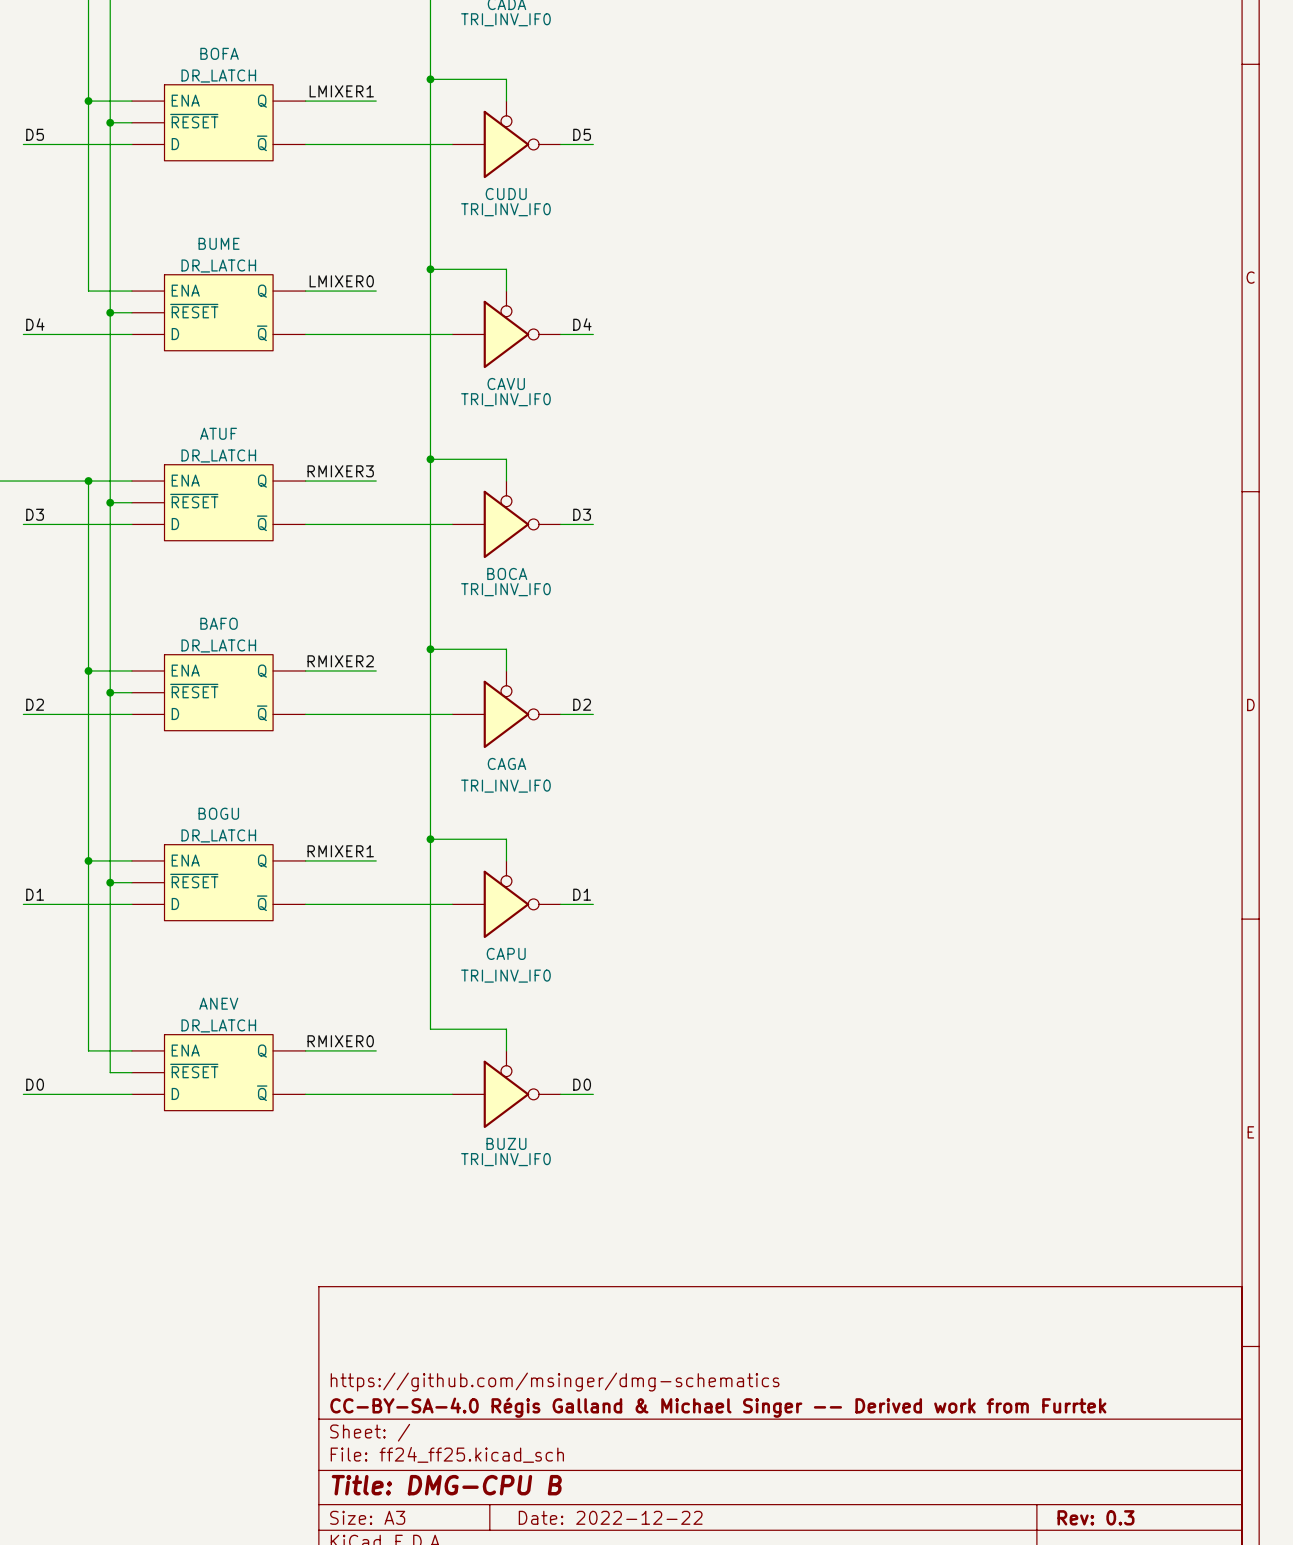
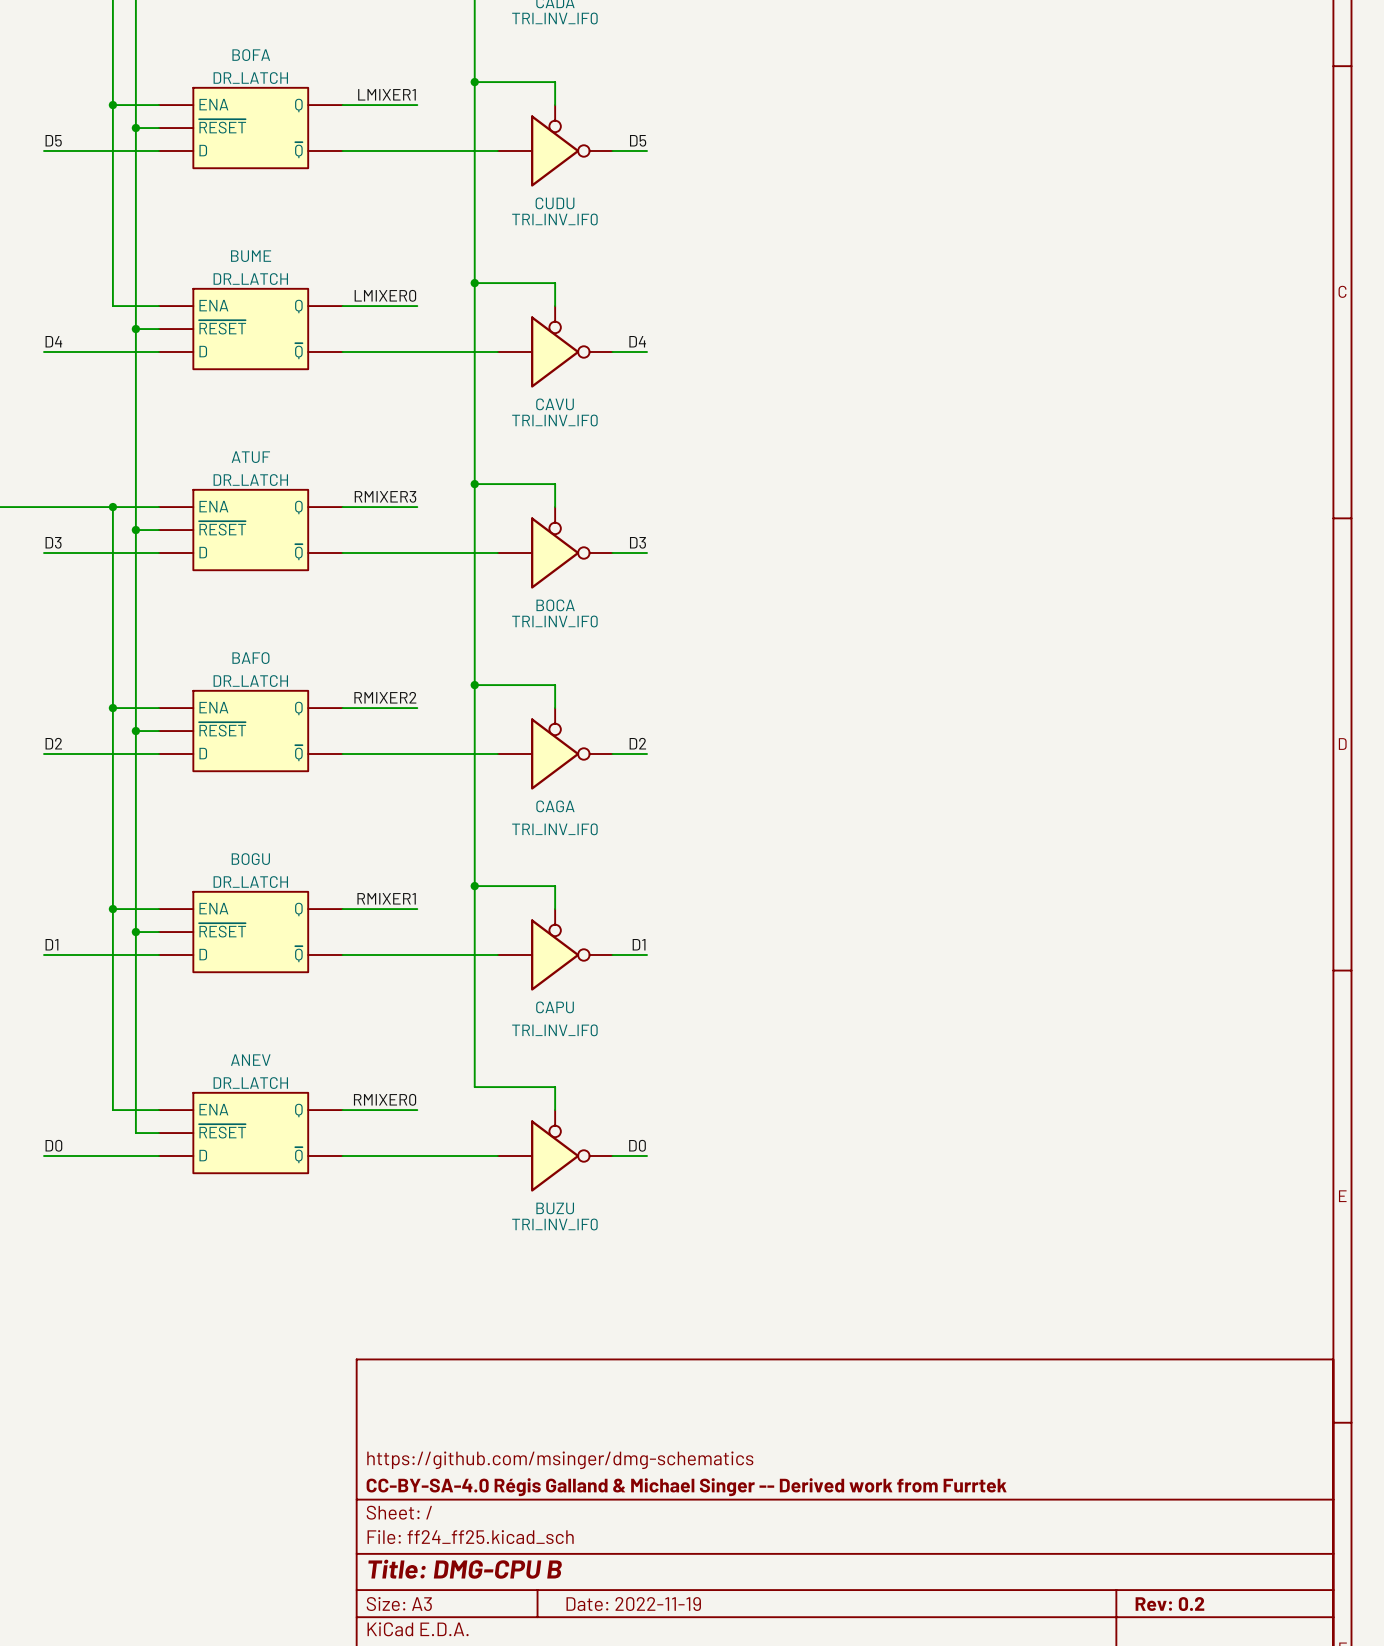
title block: Date: 2022-12-22 (610, 1517) -> Date: 2022-11-19 (633, 1604)
title block: Rev: 0.3 (1095, 1517) -> Rev: 0.2 (1169, 1604)

